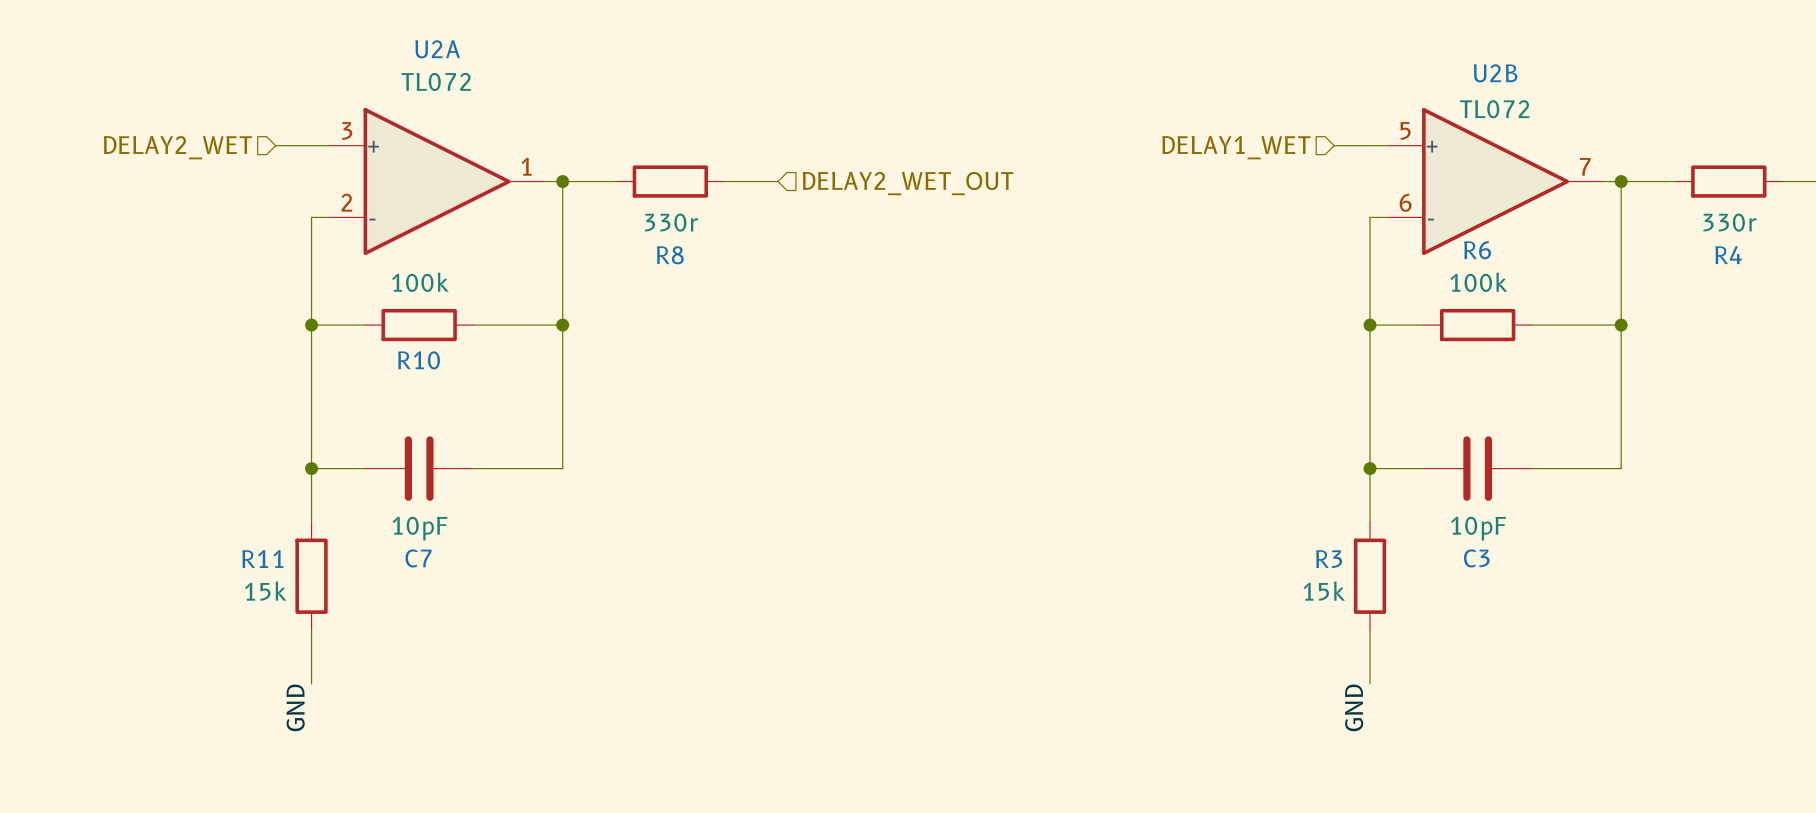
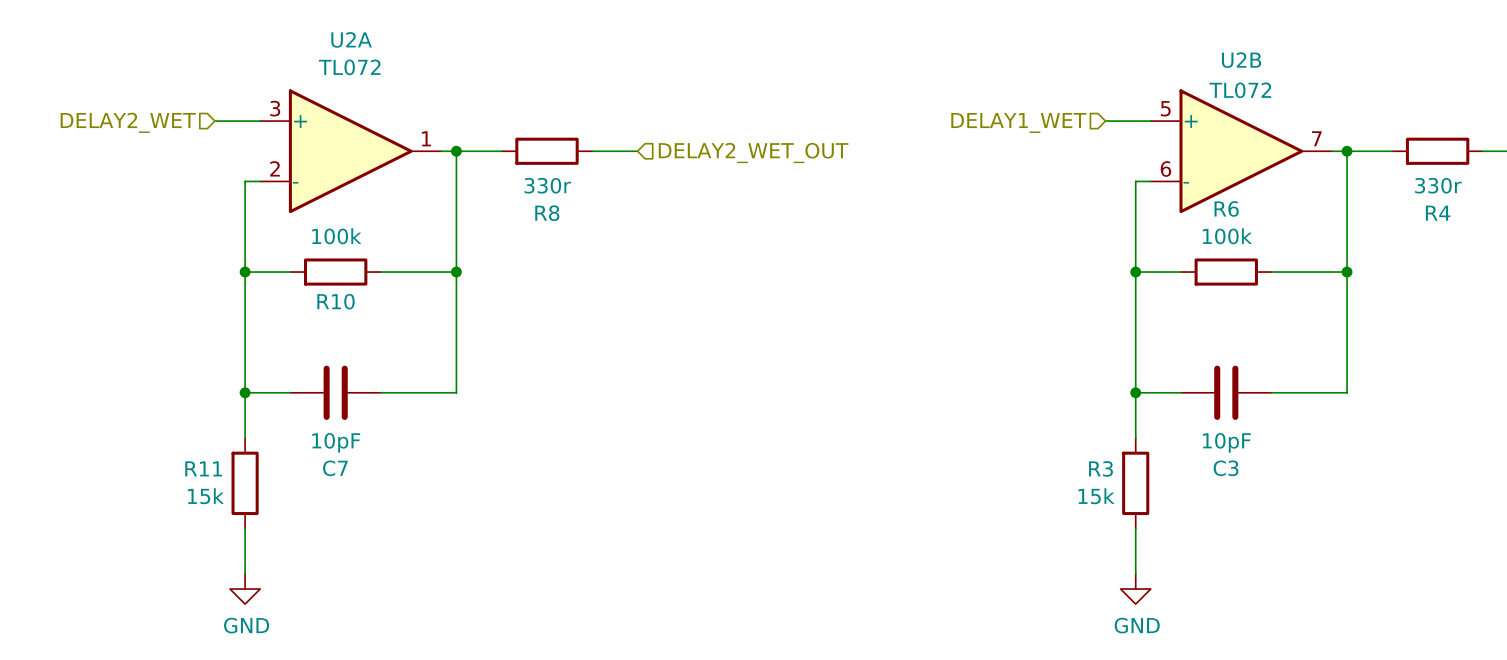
power symbol: none -> GND (245, 589)
power symbol: none -> GND (1135, 589)
label: GND (295, 707) -> none
label: GND (1354, 707) -> none

